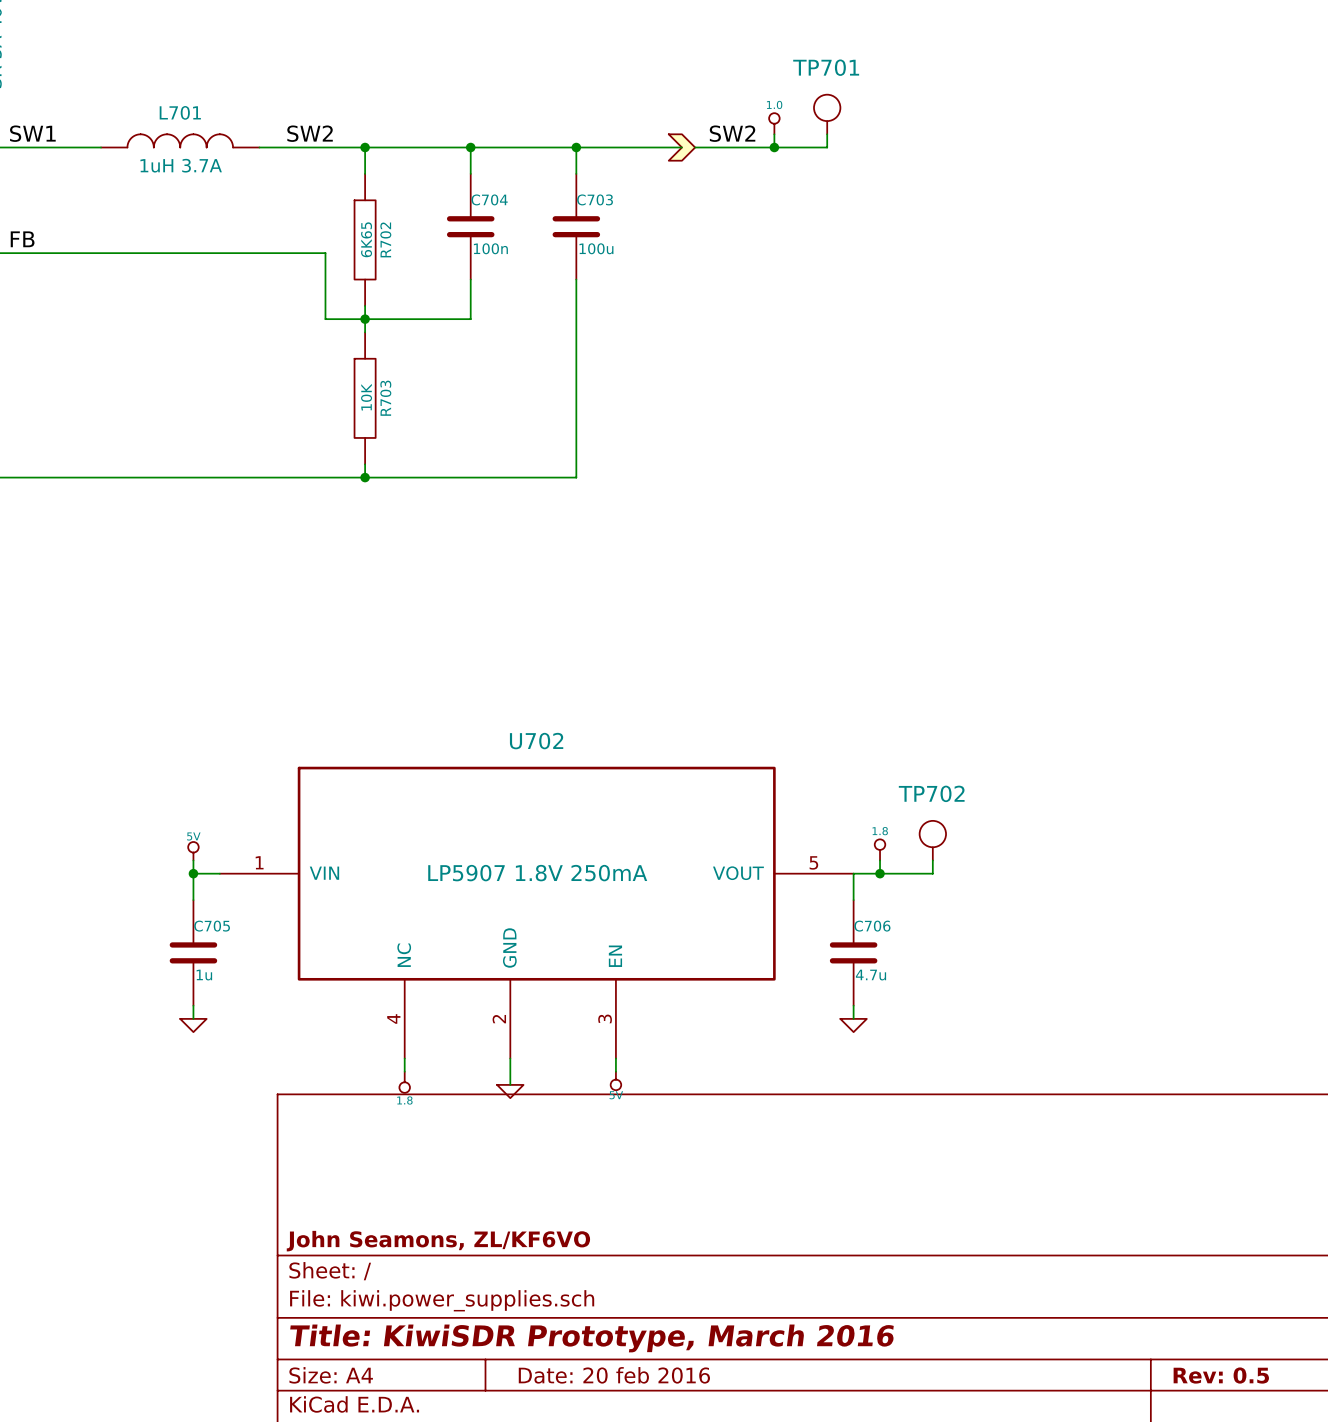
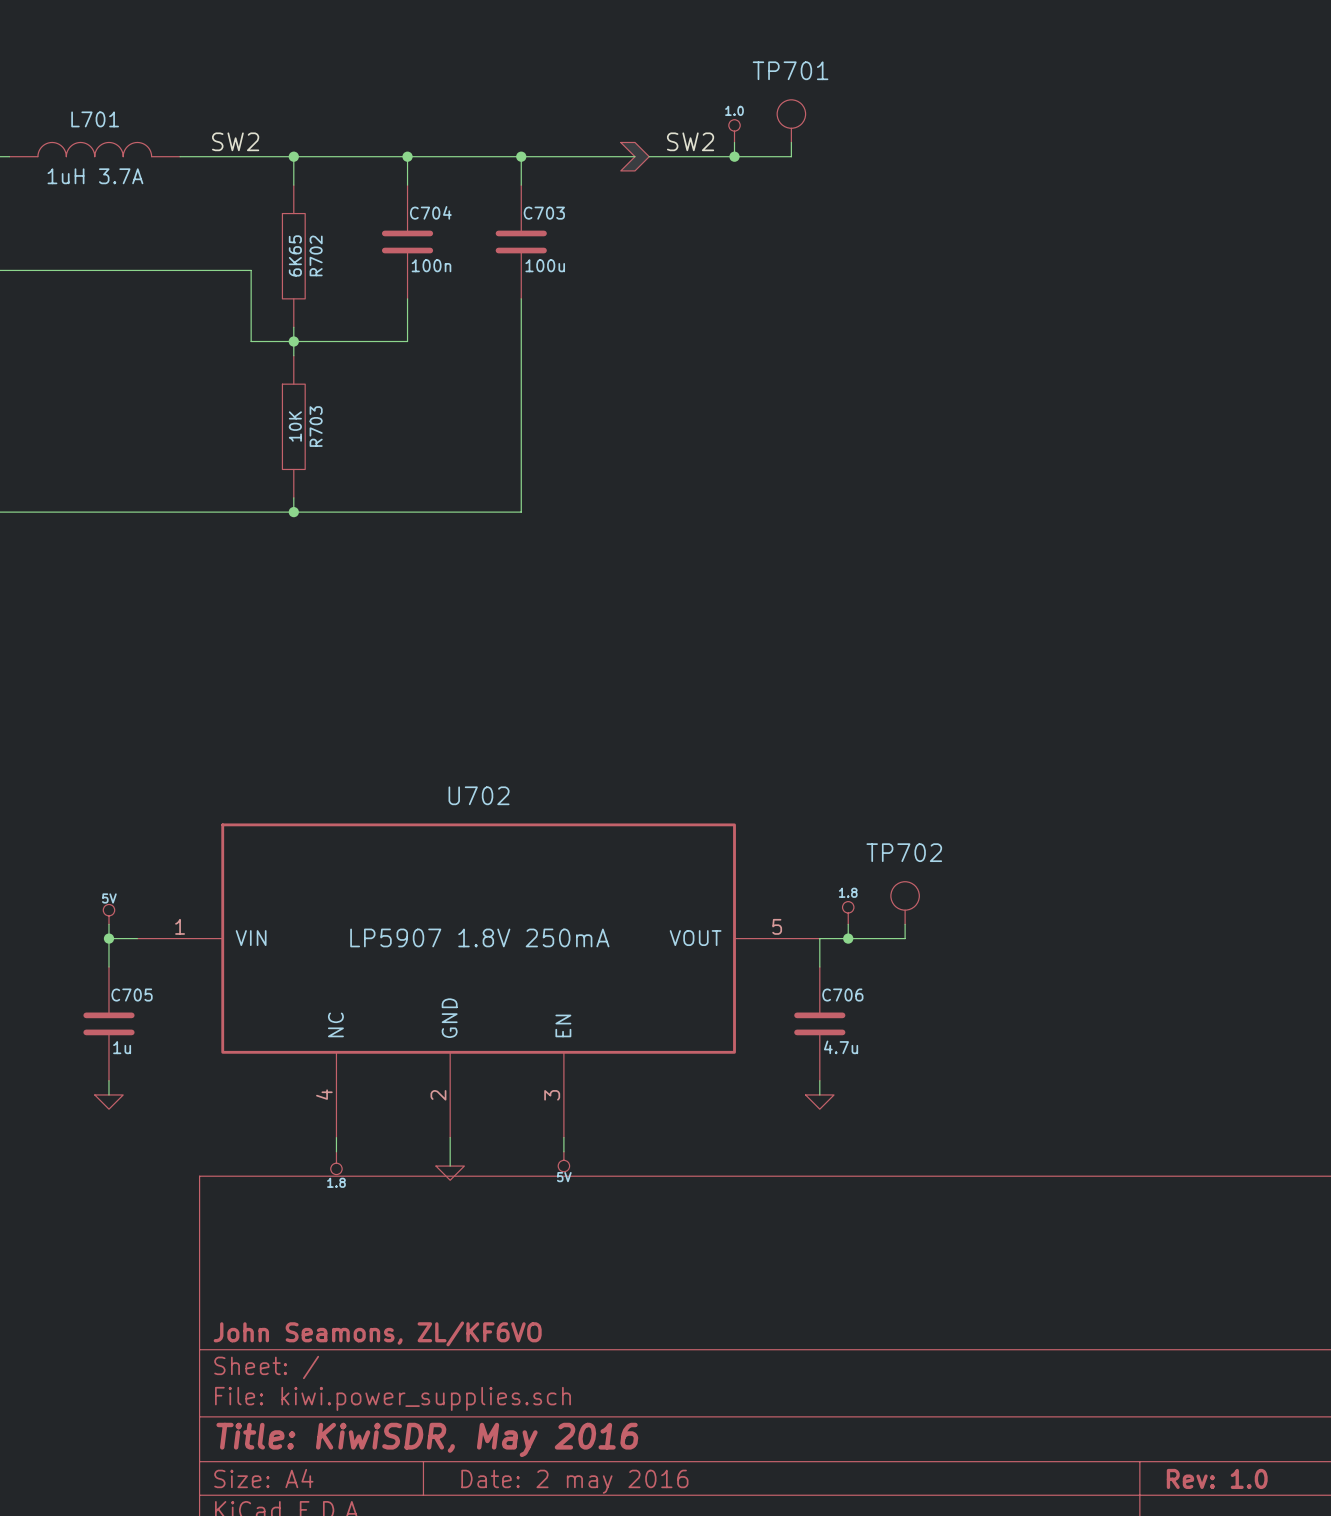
title block: Title: KiwiSDR Prototype, March 2016 (592, 1338) -> Title: KiwiSDR, May 2016 (427, 1439)
title block: Date: 20 feb 2016 (614, 1375) -> Date: 2 may 2016 (574, 1481)
title block: Rev: 0.5 (1221, 1375) -> Rev: 1.0 (1217, 1478)

